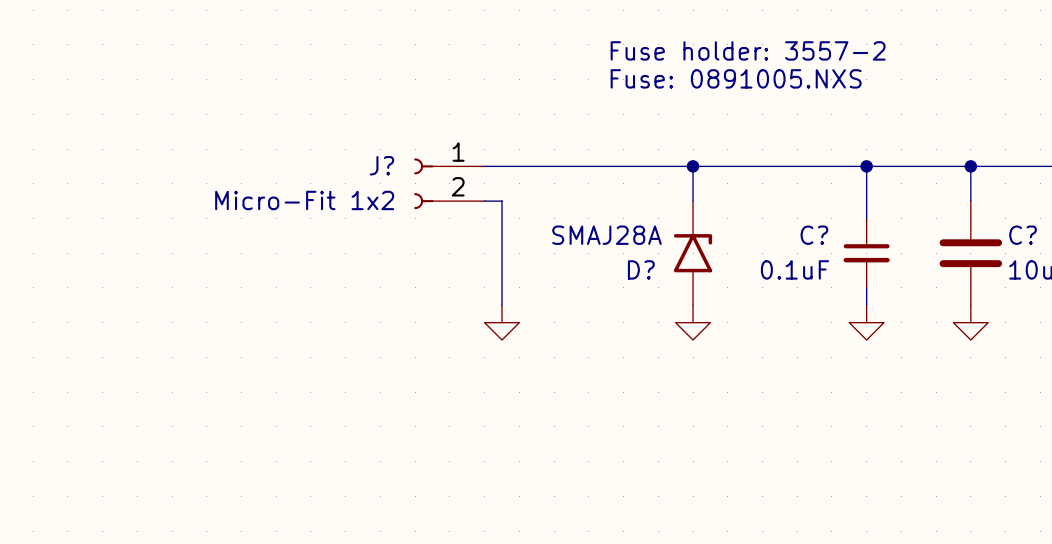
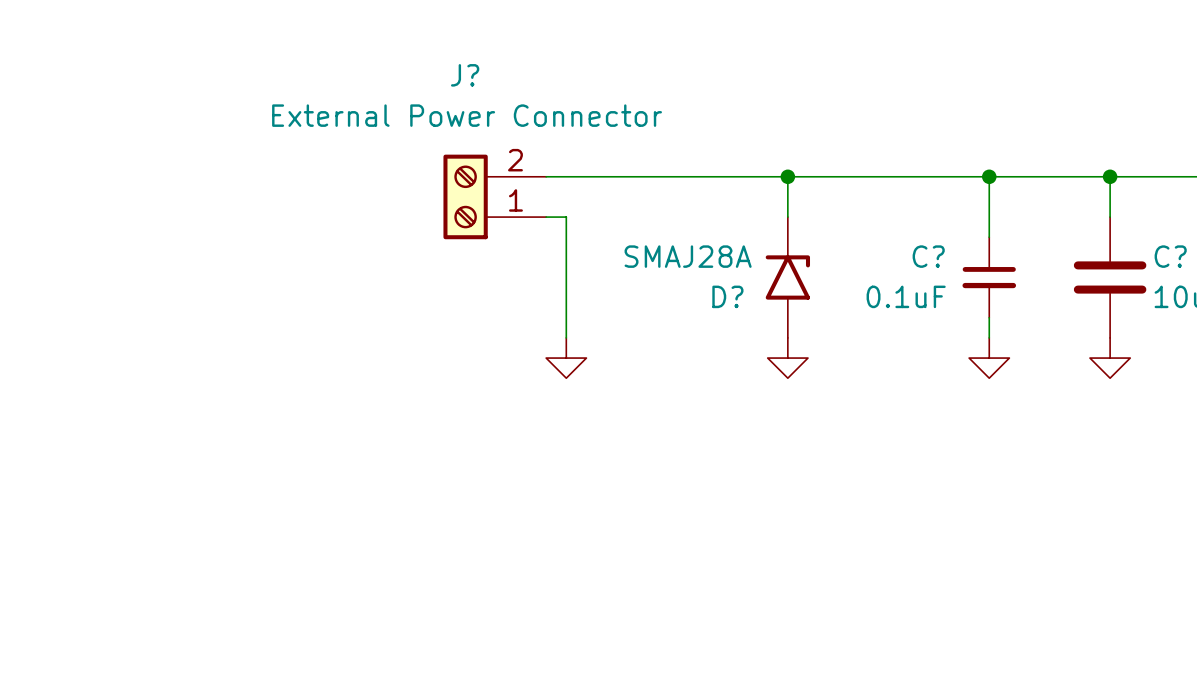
text: Fuse holder: 3557-2 (748, 50) -> none
text: Fuse: 0891005.NXS (736, 78) -> none
J? symbol: [414, 158, 485, 210] -> [443, 154, 547, 240]
J? name position: J? (381, 165) -> J? (465, 75)
J? value: Micro-Fit 1x2 (304, 200) -> External Power Connector (467, 115)

